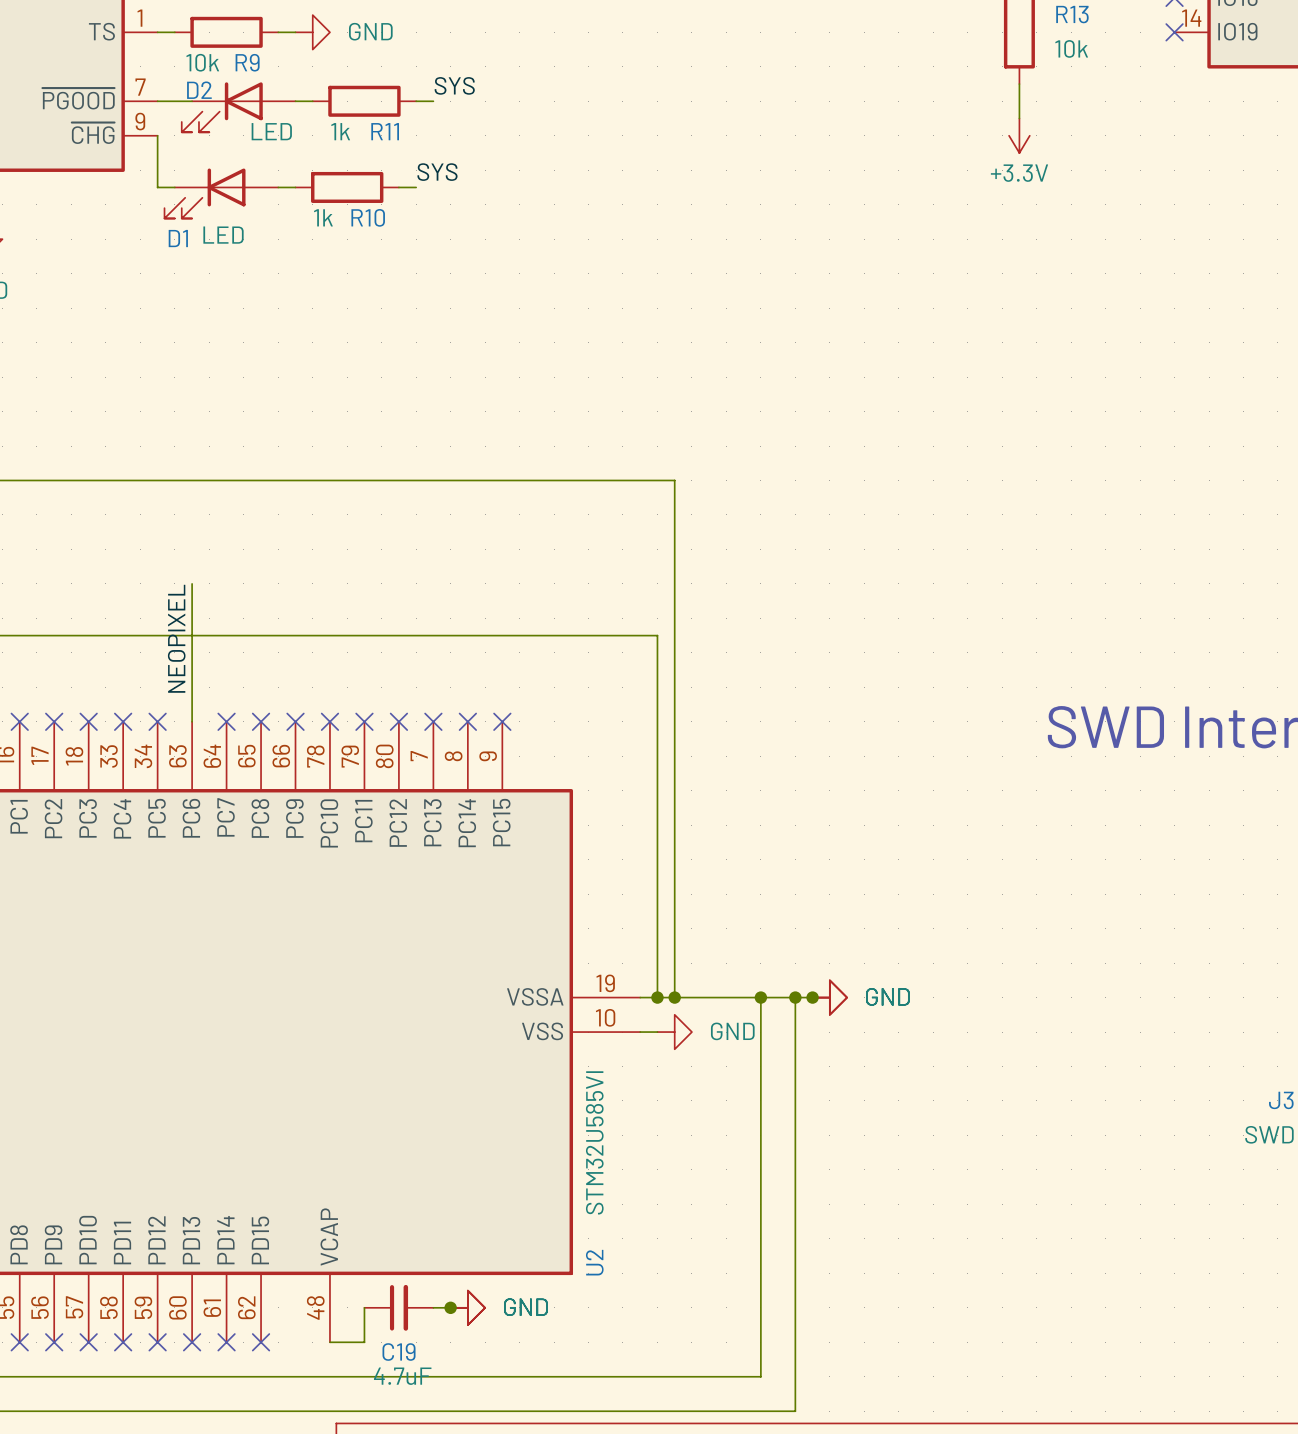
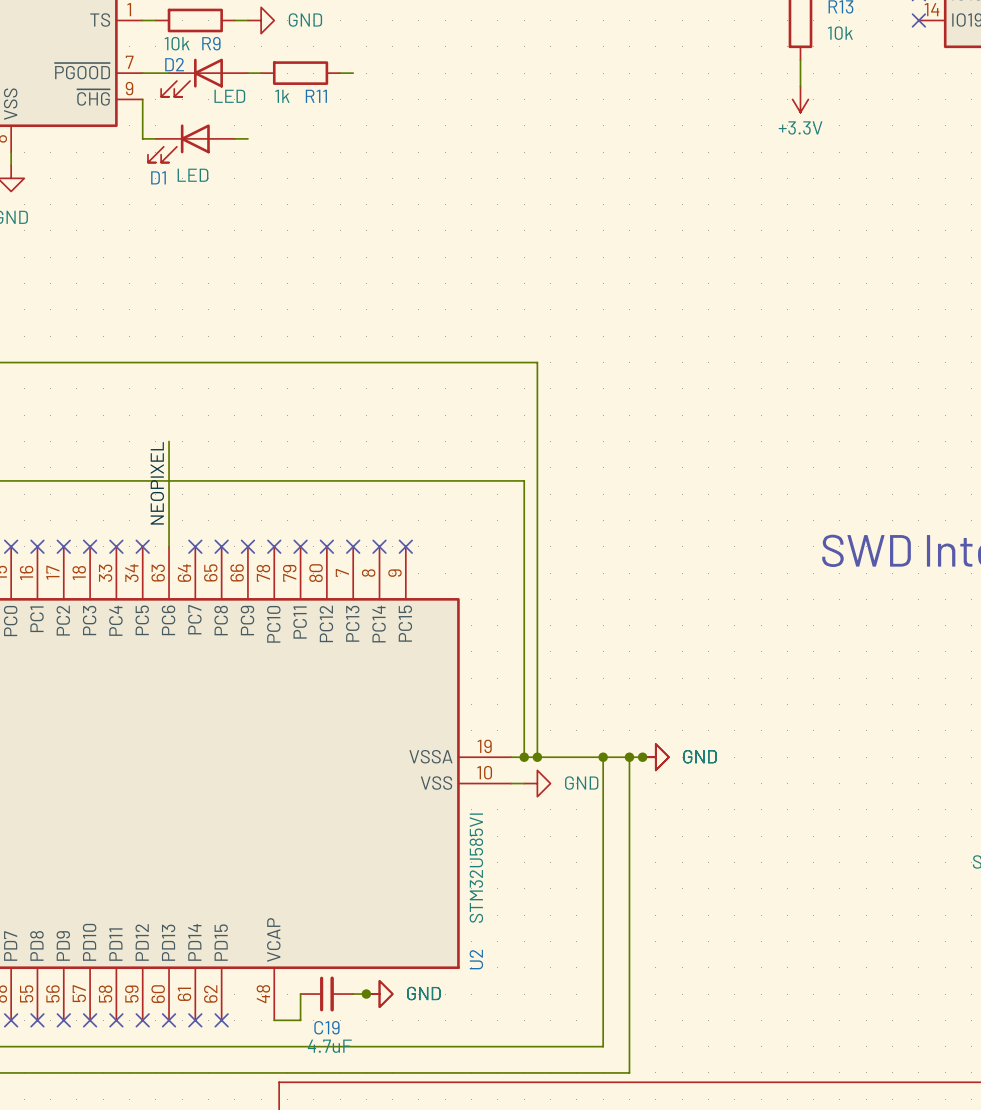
label: SYS (454, 85) -> none
label: SYS (437, 172) -> none
R10: 1k (347, 187) -> none
wire: (398, 187) (416, 187) -> none

